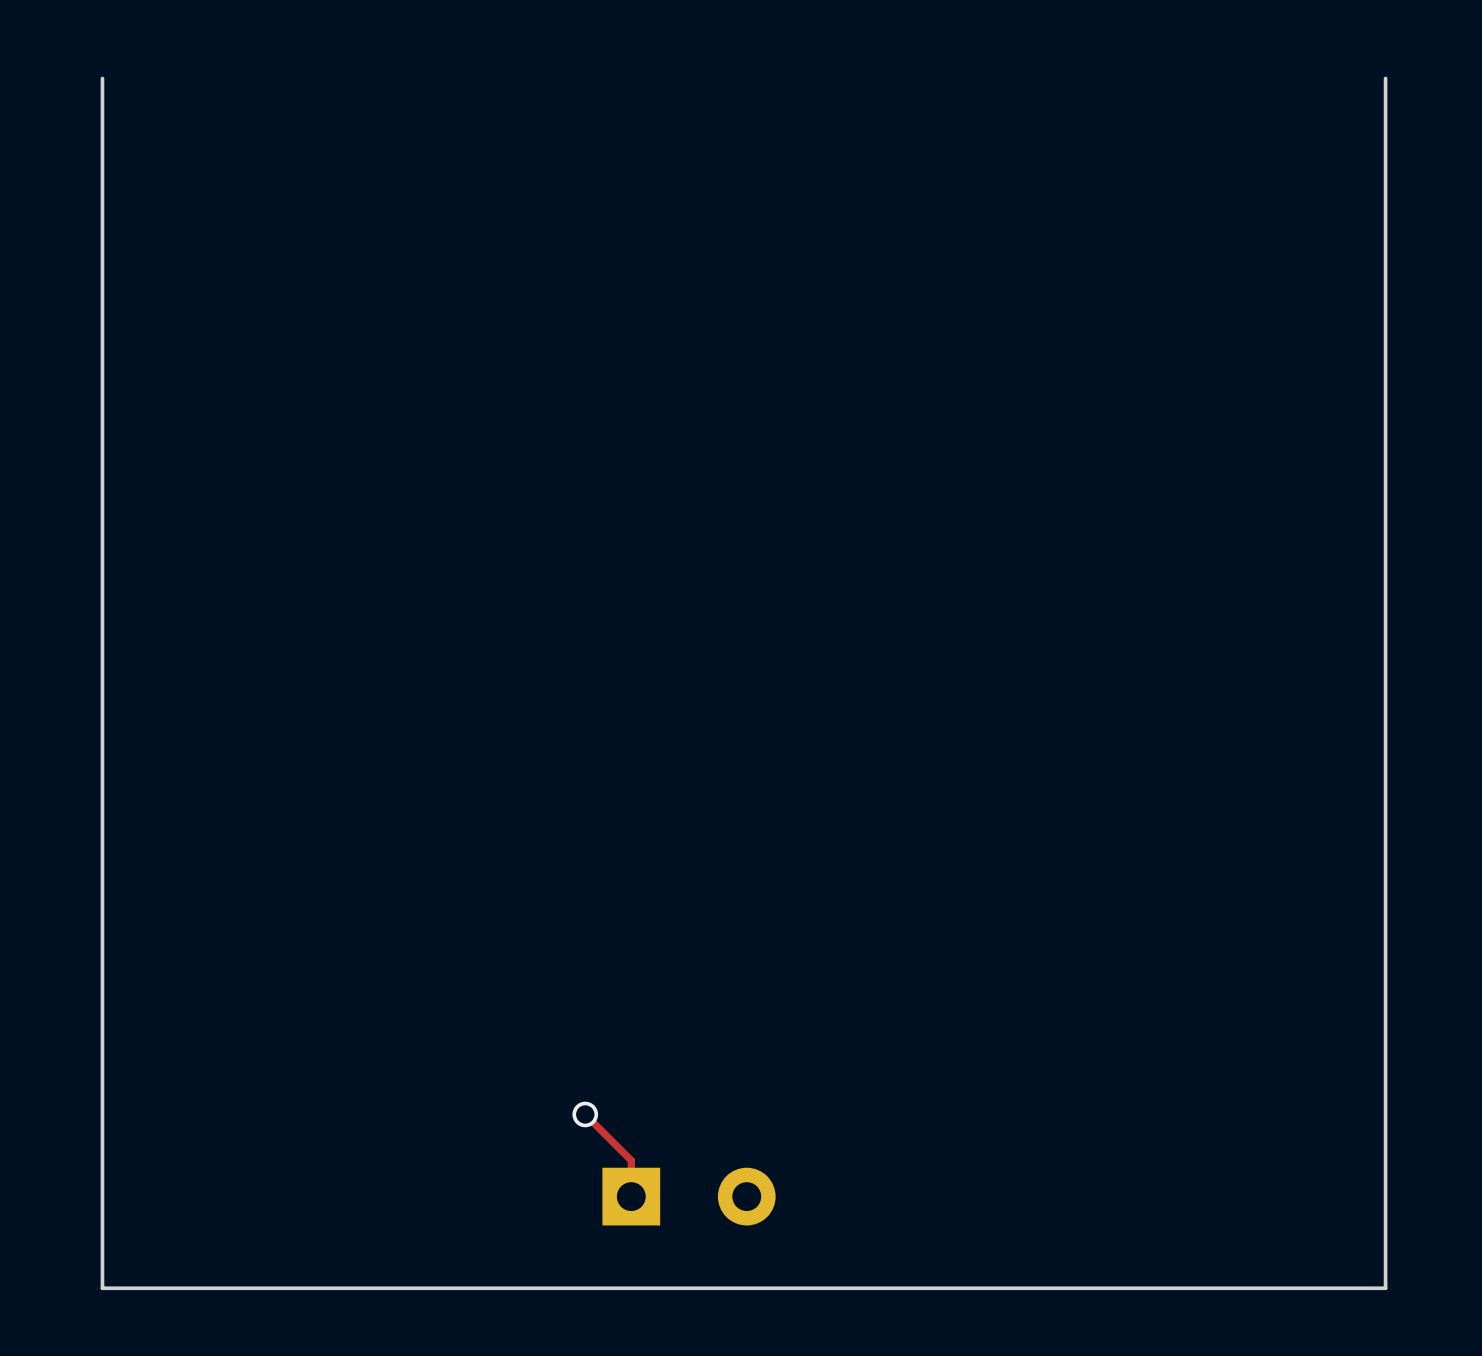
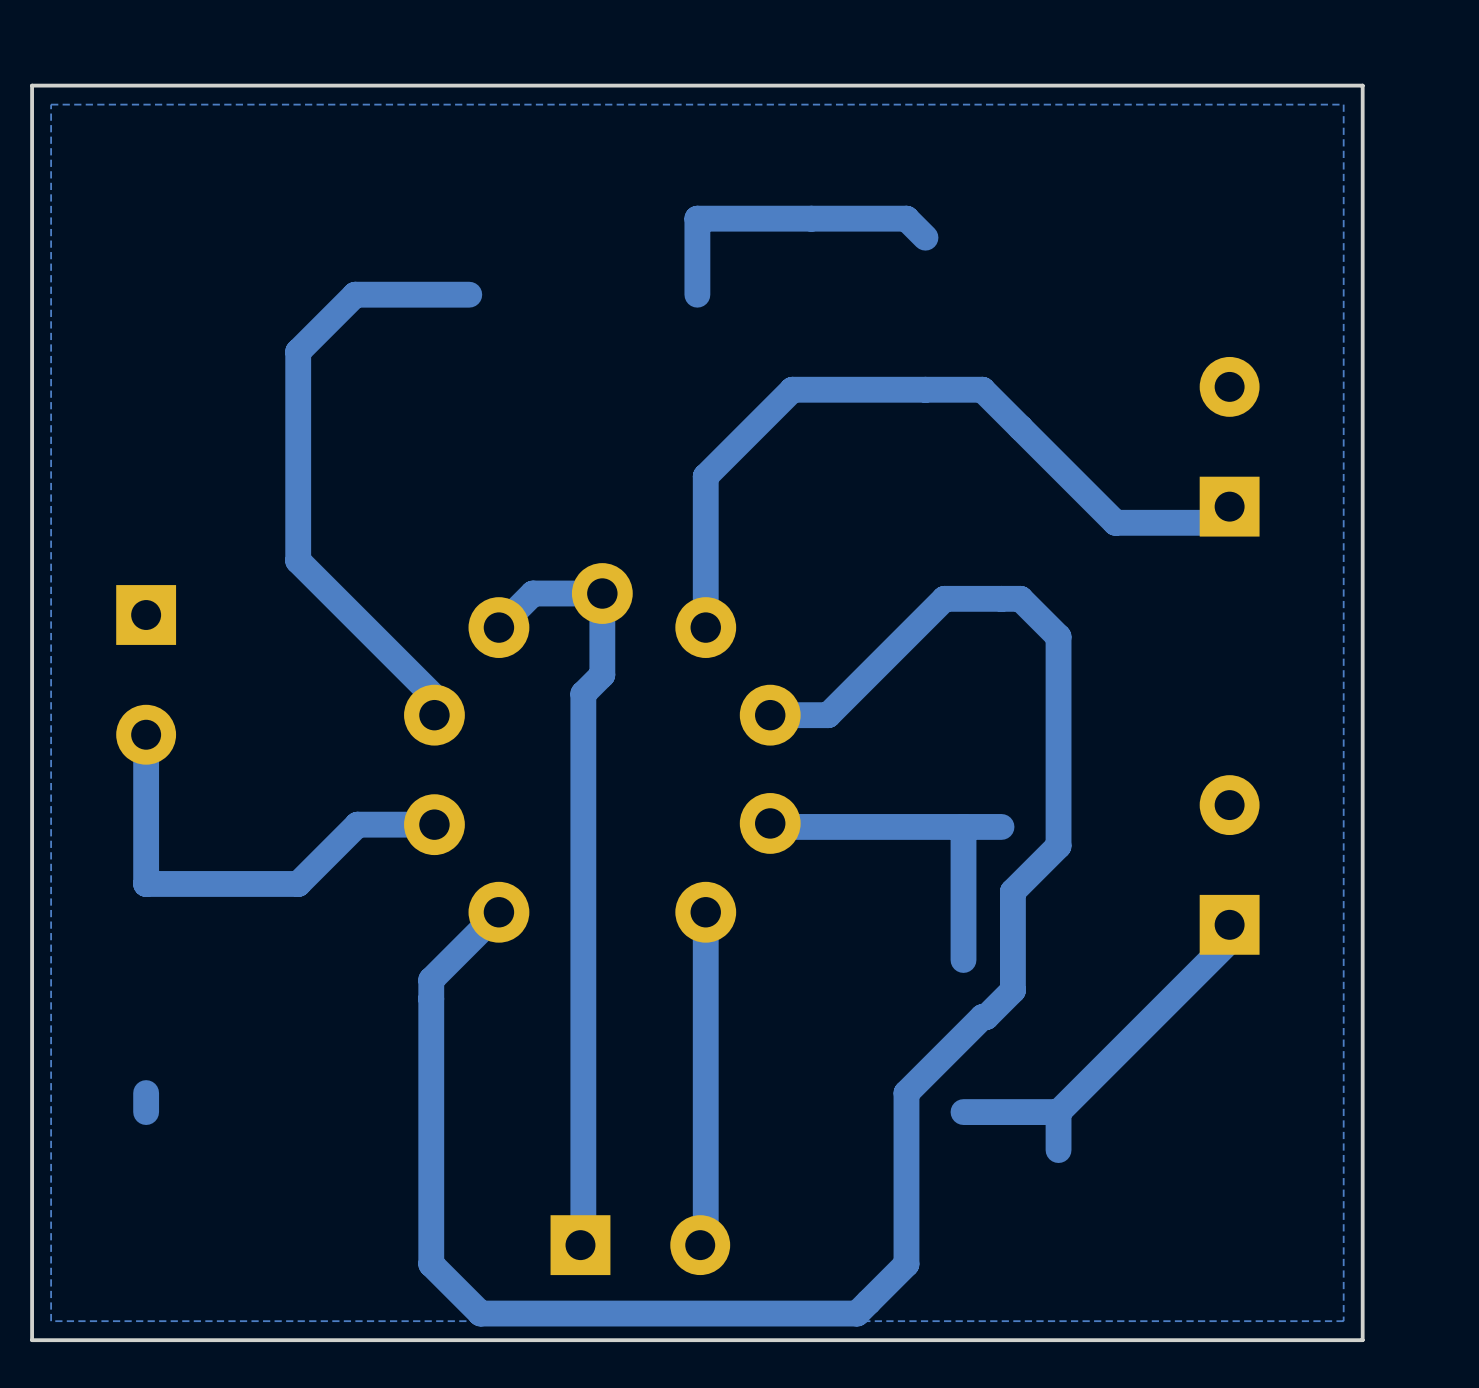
board edge: none -> (1362, 85) (32, 85)
bottom zone outline: none -> (1343, 104) (51, 104) (51, 1321) (1343, 1321) (1343, 104)
bottom track: none -> (925, 237) (906, 218) (697, 218) (697, 294)
bottom track: none -> (469, 294) (355, 294) (298, 351) (298, 560) (434, 697) (434, 715)
part: none -> (1229, 446)
bottom track: none -> (1229, 522) (1115, 522) (982, 389) (792, 389) (705, 476) (705, 627)
bottom track: none -> (498, 627) (533, 593) (602, 593) (602, 674) (583, 693) (583, 1226) (564, 1245)
part: none -> (146, 674)
bottom track: none -> (770, 715) (828, 715) (944, 598) (1020, 598) (1058, 636) (1058, 845) (1012, 891) (1012, 990) (986, 1017) (982, 1017) (906, 1093) (906, 1264) (857, 1313) (480, 1313) (431, 1264) (431, 979) (498, 912)
bottom track: none -> (146, 750) (146, 883) (298, 883) (357, 824) (434, 824)
part: none -> (602, 752)
bottom track: none -> (770, 823) (773, 826) (1001, 826)
bottom track: none -> (963, 826) (963, 960)
part: none -> (1229, 864)
bottom track: none -> (705, 912) (705, 1234) (716, 1245)
bottom track: none -> (1229, 940) (1058, 1112)
bottom track: none -> (146, 1093) (146, 1112)
bottom track: none -> (1058, 1112) (963, 1112)
bottom track: none -> (1058, 1112) (1058, 1150)
top track: (585, 1114) (631, 1160) (631, 1196) -> none
via: (585, 1114) -> none

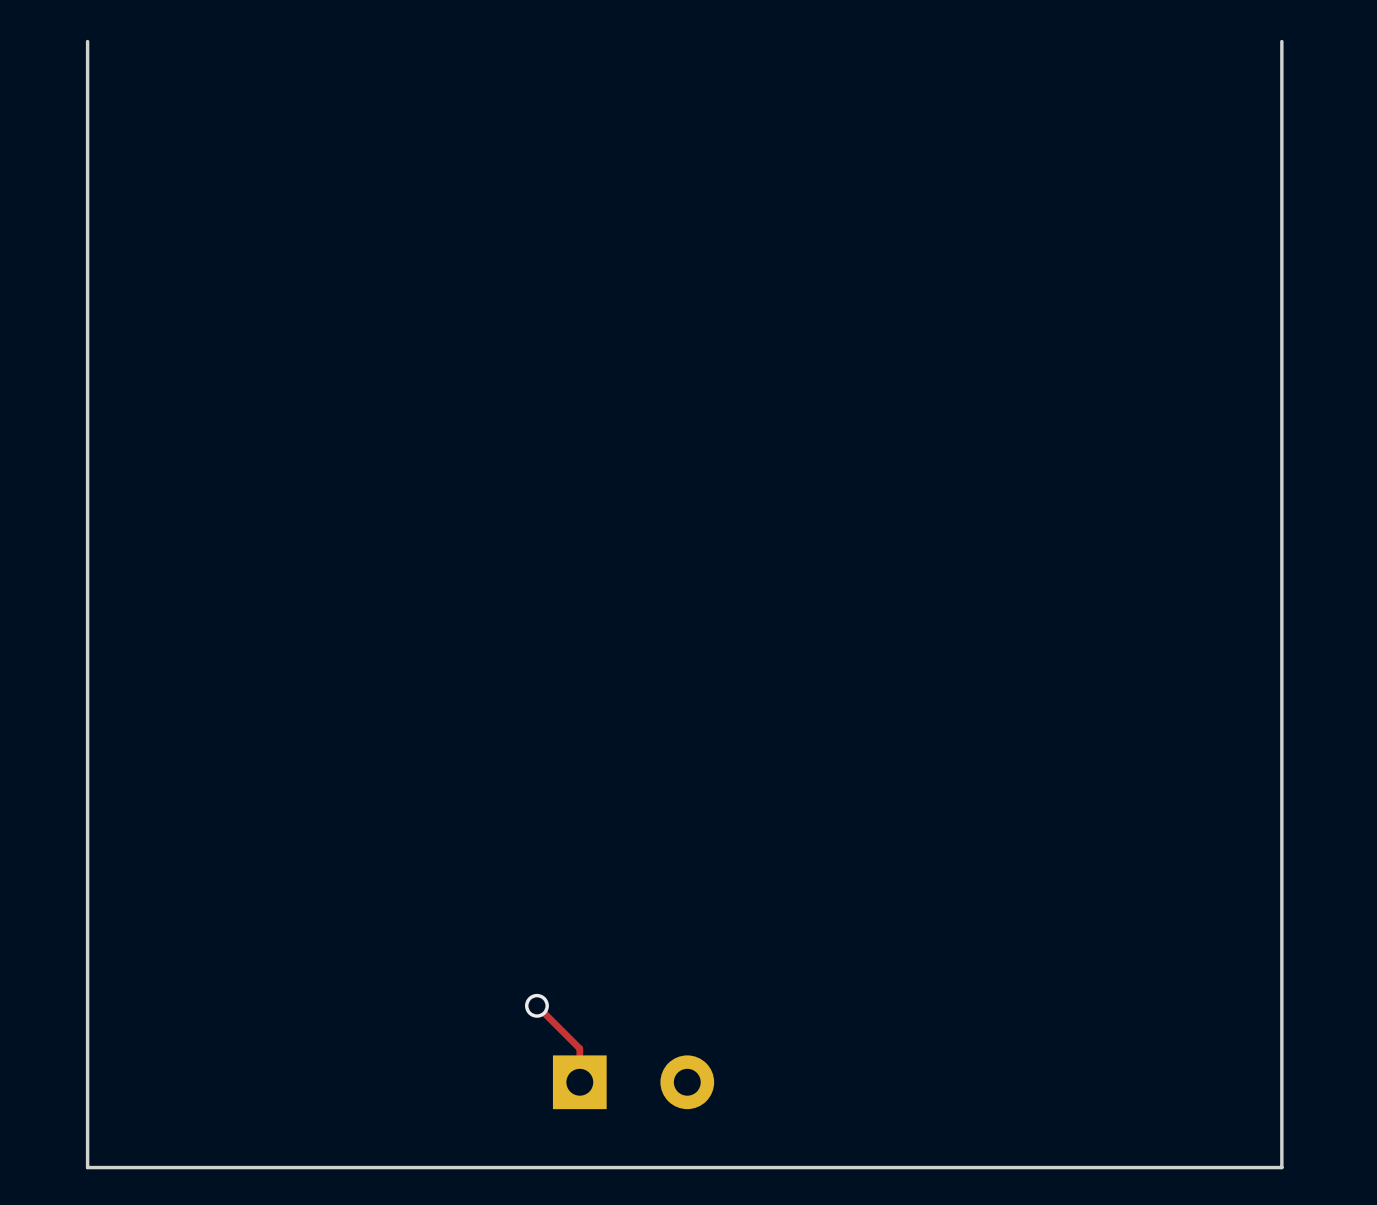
board edge: (1362, 85) (32, 85) -> none
bottom zone outline: (1343, 104) (51, 104) (51, 1321) (1343, 1321) (1343, 104) -> none
bottom track: (925, 237) (906, 218) (697, 218) (697, 294) -> none
bottom track: (469, 294) (355, 294) (298, 351) (298, 560) (434, 697) (434, 715) -> none
part: (1229, 446) -> none
bottom track: (1229, 522) (1115, 522) (982, 389) (792, 389) (705, 476) (705, 627) -> none
bottom track: (498, 627) (533, 593) (602, 593) (602, 674) (583, 693) (583, 1226) (564, 1245) -> none
part: (146, 674) -> none
bottom track: (770, 715) (828, 715) (944, 598) (1020, 598) (1058, 636) (1058, 845) (1012, 891) (1012, 990) (986, 1017) (982, 1017) (906, 1093) (906, 1264) (857, 1313) (480, 1313) (431, 1264) (431, 979) (498, 912) -> none
bottom track: (146, 750) (146, 883) (298, 883) (357, 824) (434, 824) -> none
part: (602, 752) -> none
bottom track: (770, 823) (773, 826) (1001, 826) -> none
bottom track: (963, 826) (963, 960) -> none
part: (1229, 864) -> none
bottom track: (705, 912) (705, 1234) (716, 1245) -> none
bottom track: (1229, 940) (1058, 1112) -> none
bottom track: (146, 1093) (146, 1112) -> none
bottom track: (1058, 1112) (963, 1112) -> none
bottom track: (1058, 1112) (1058, 1150) -> none
top track: none -> (536, 1005) (579, 1048) (579, 1082)
via: none -> (536, 1005)

